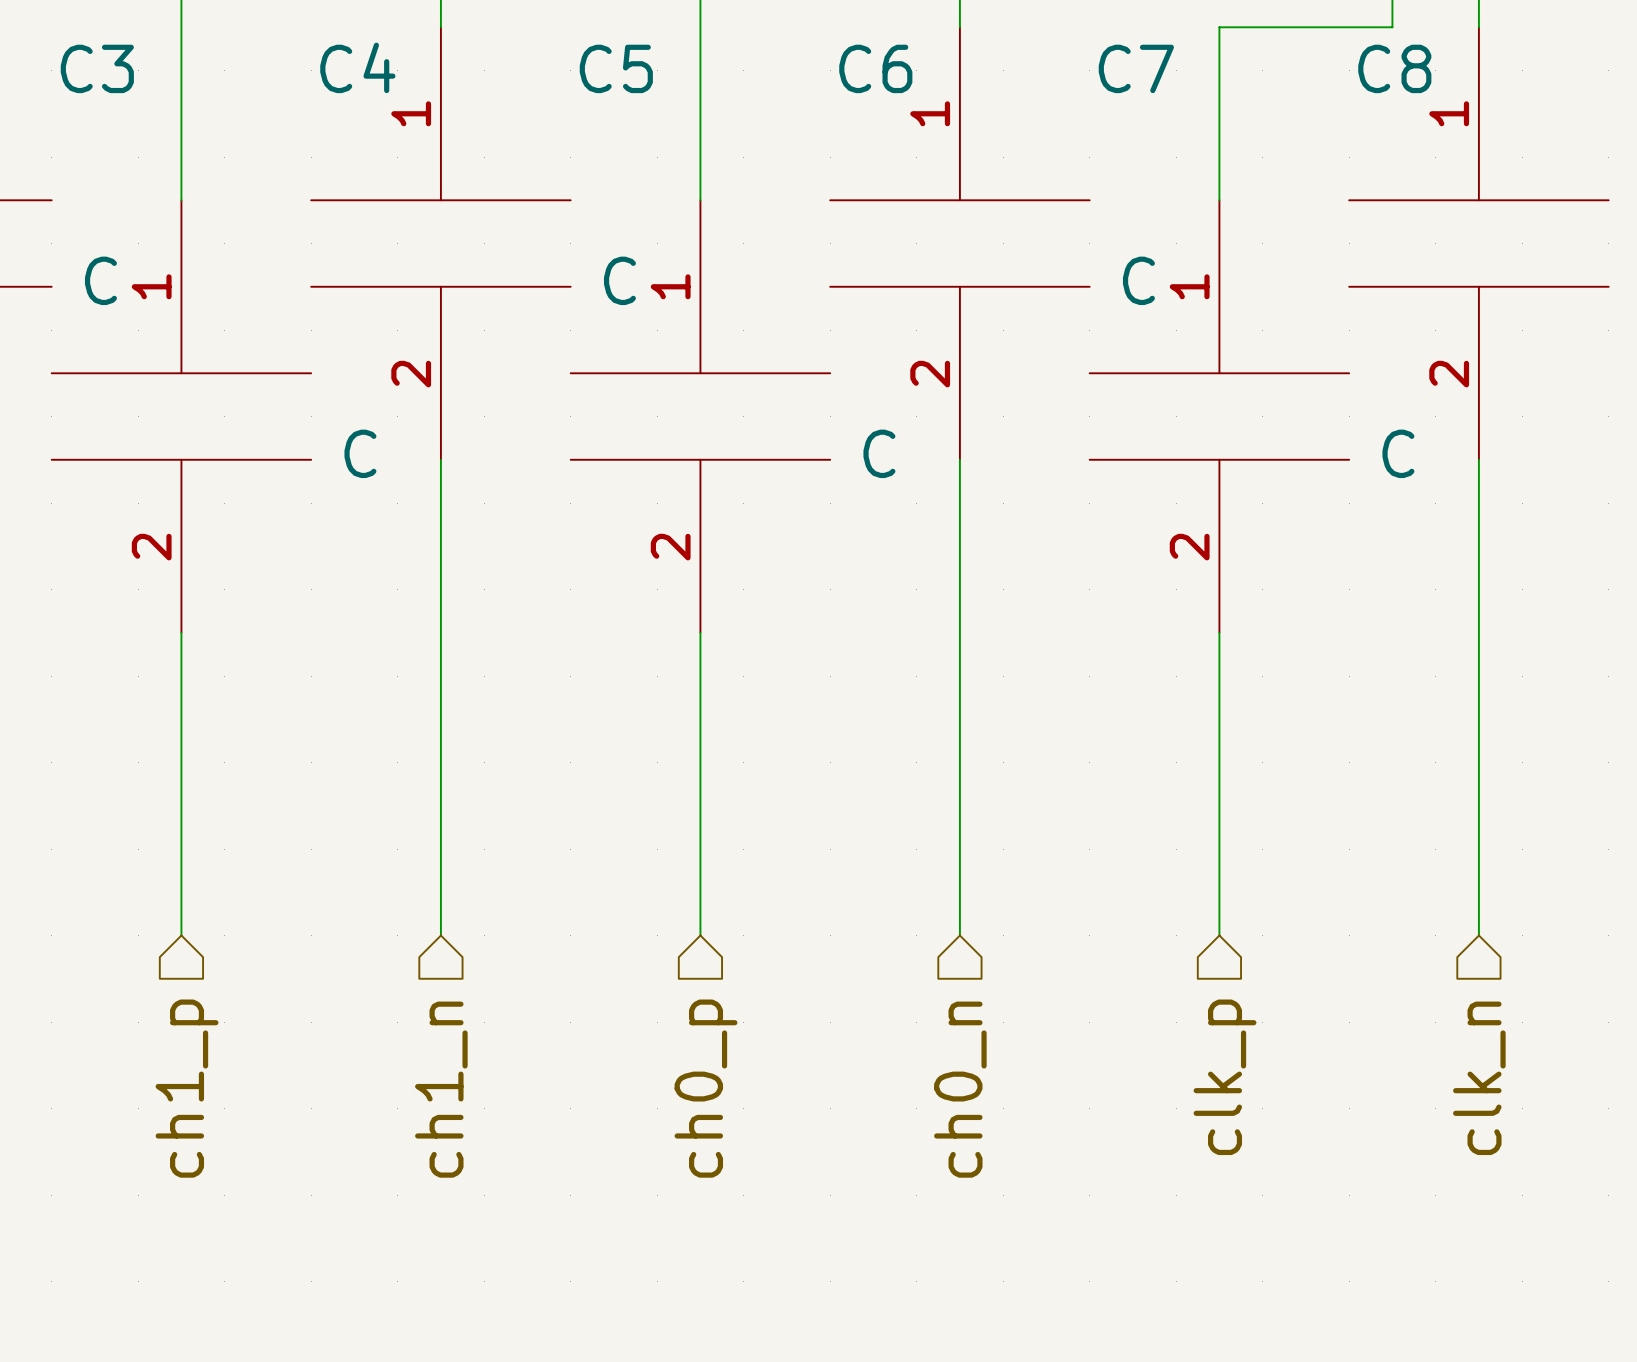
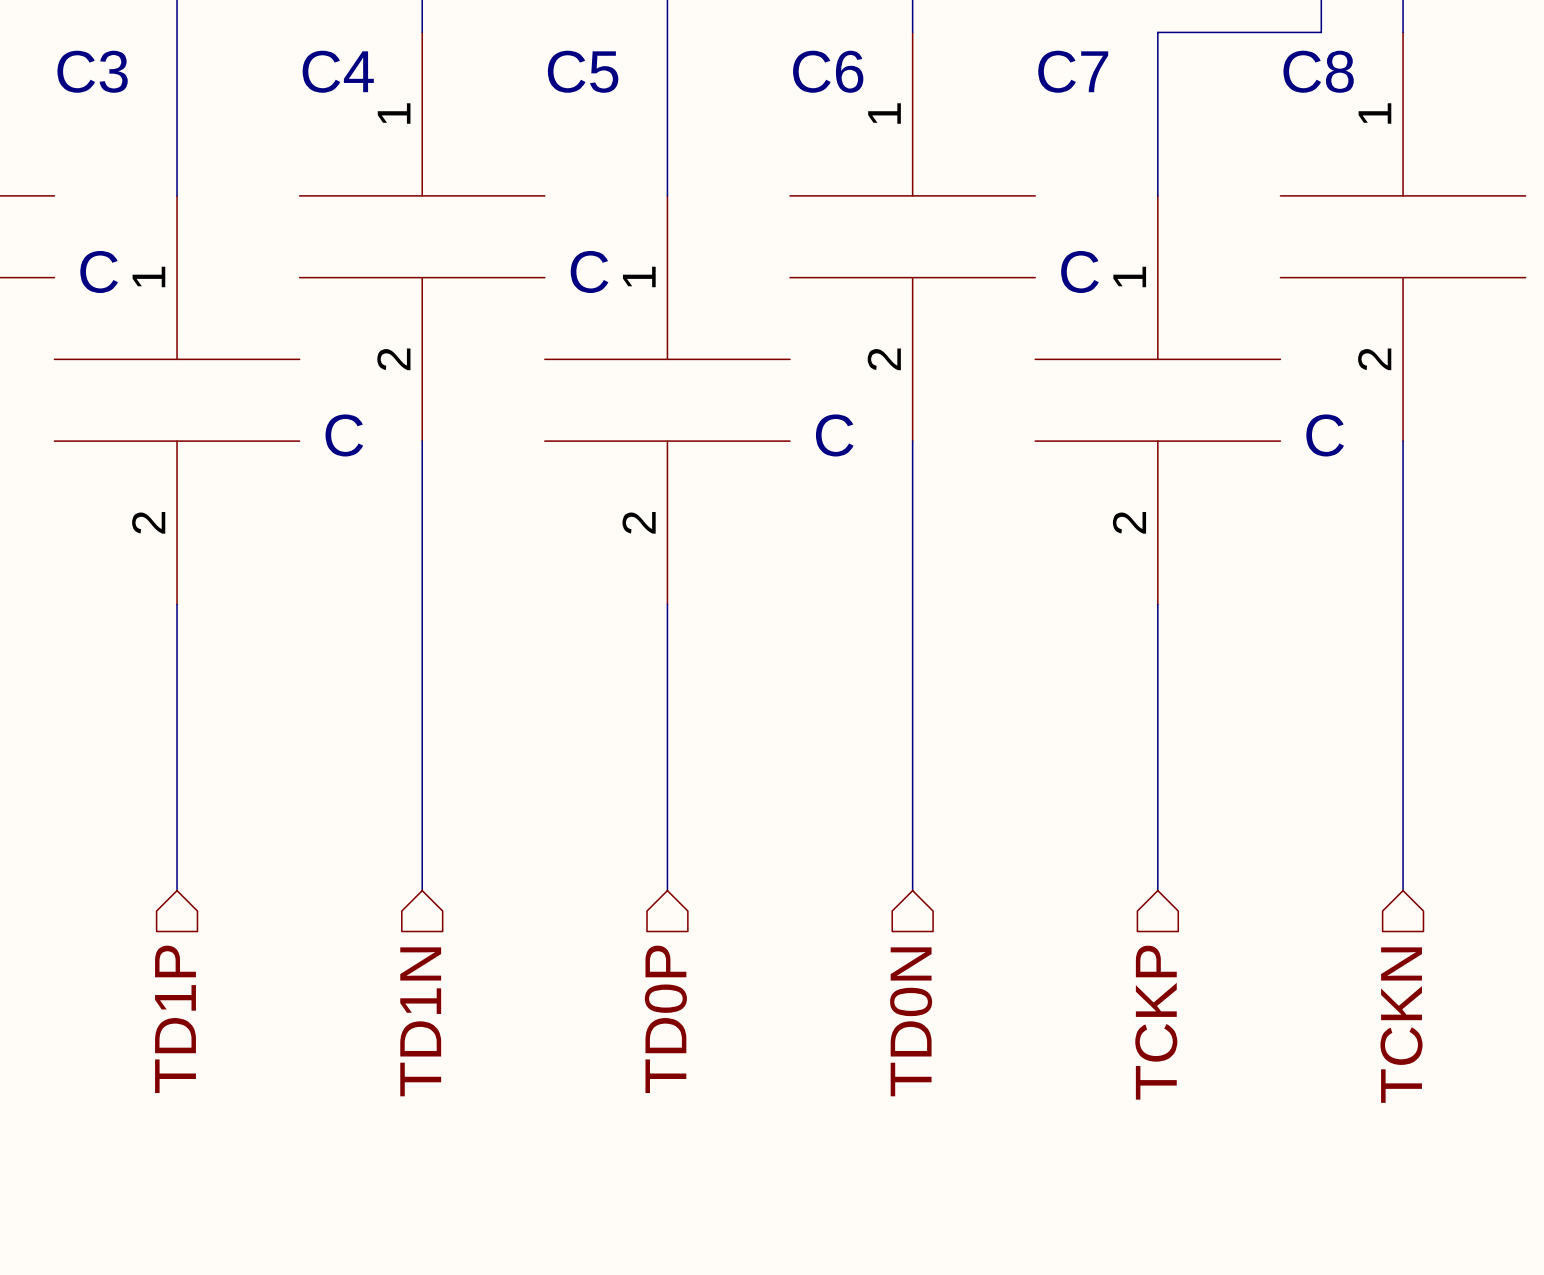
hierarchical label: clk_p (1225, 1077) -> TCKP (1156, 1022)
hierarchical label: clk_n (1479, 1078) -> TCKN (1401, 1025)
hierarchical label: ch1_p (187, 1088) -> TD1P (175, 1019)
hierarchical label: ch0_p (706, 1088) -> TD0P (665, 1019)
hierarchical label: ch1_n (441, 1089) -> TD1N (420, 1021)
hierarchical label: ch0_n (960, 1089) -> TD0N (911, 1021)

